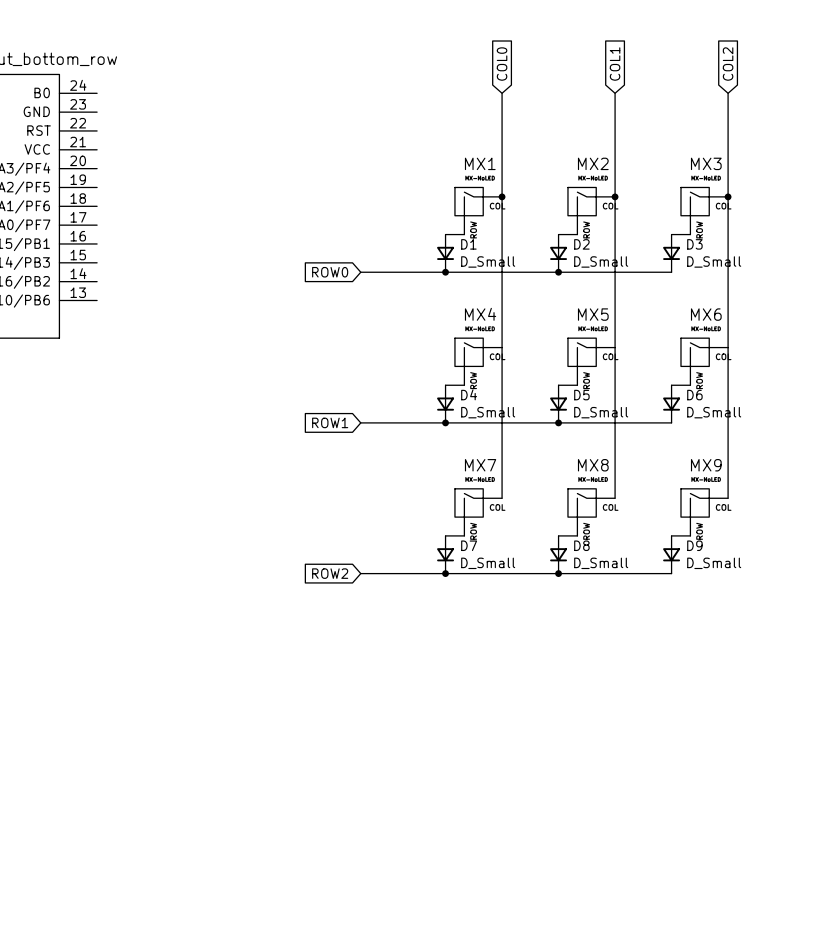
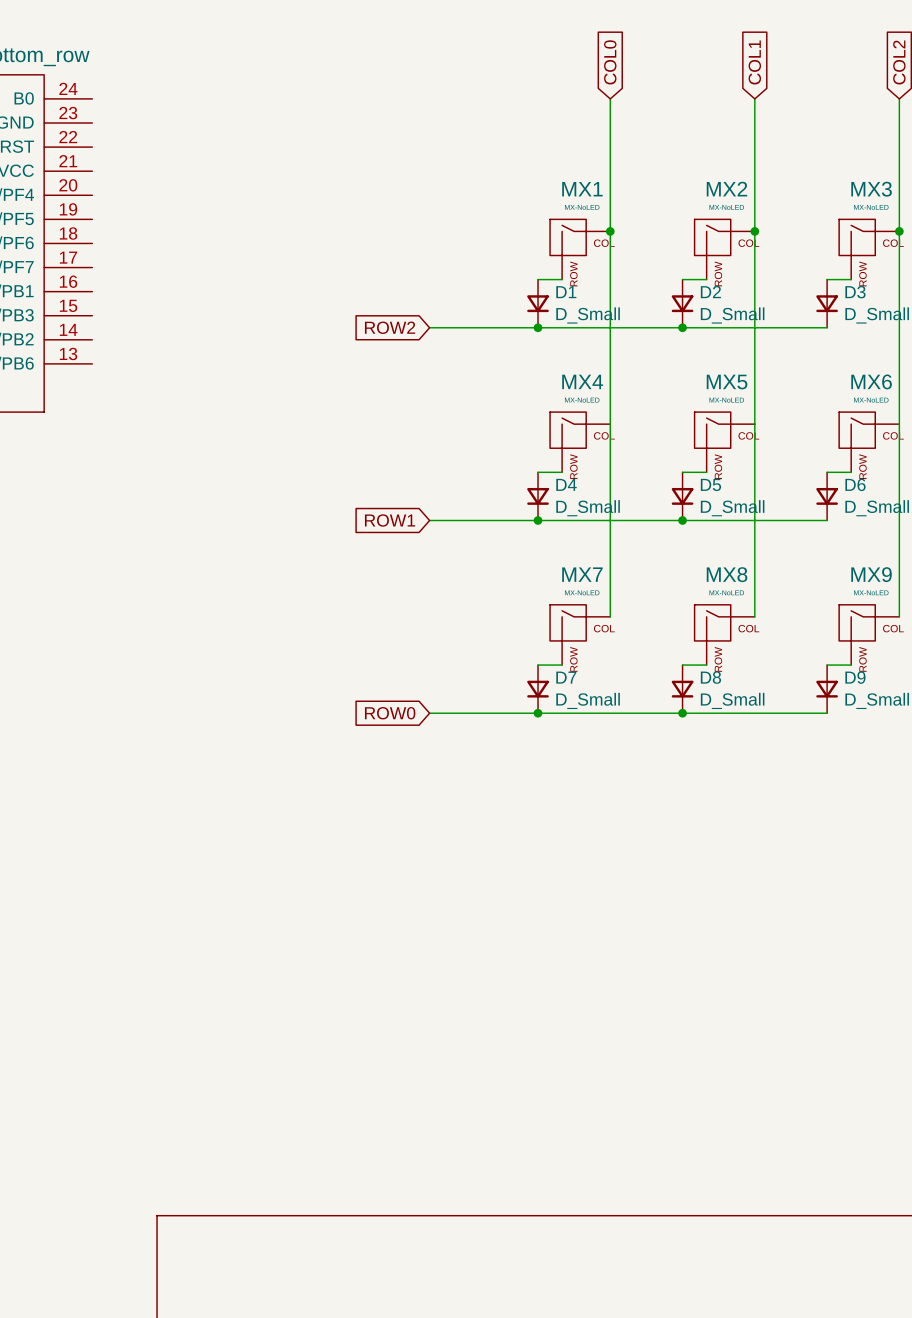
global label: ROW0 (330, 272) -> ROW2 (390, 327)
global label: ROW2 (330, 573) -> ROW0 (390, 713)

